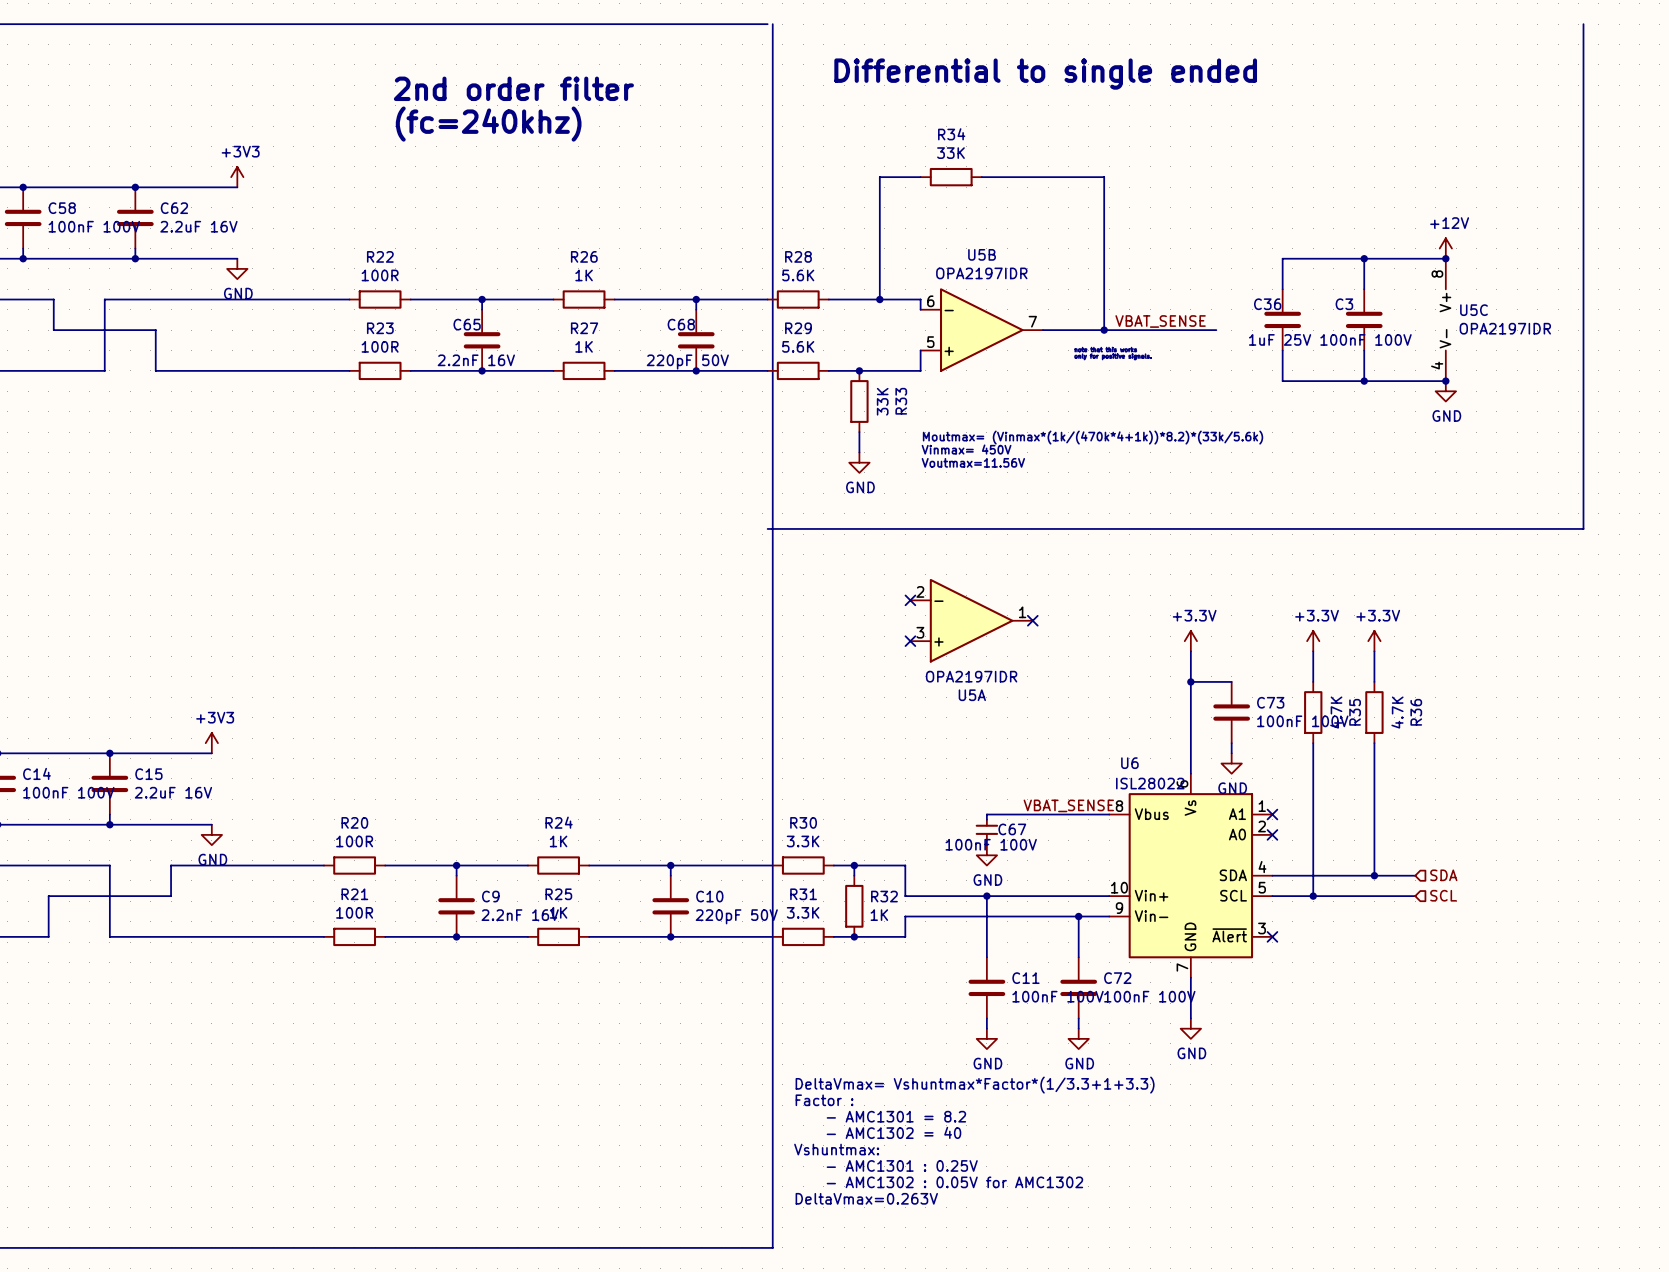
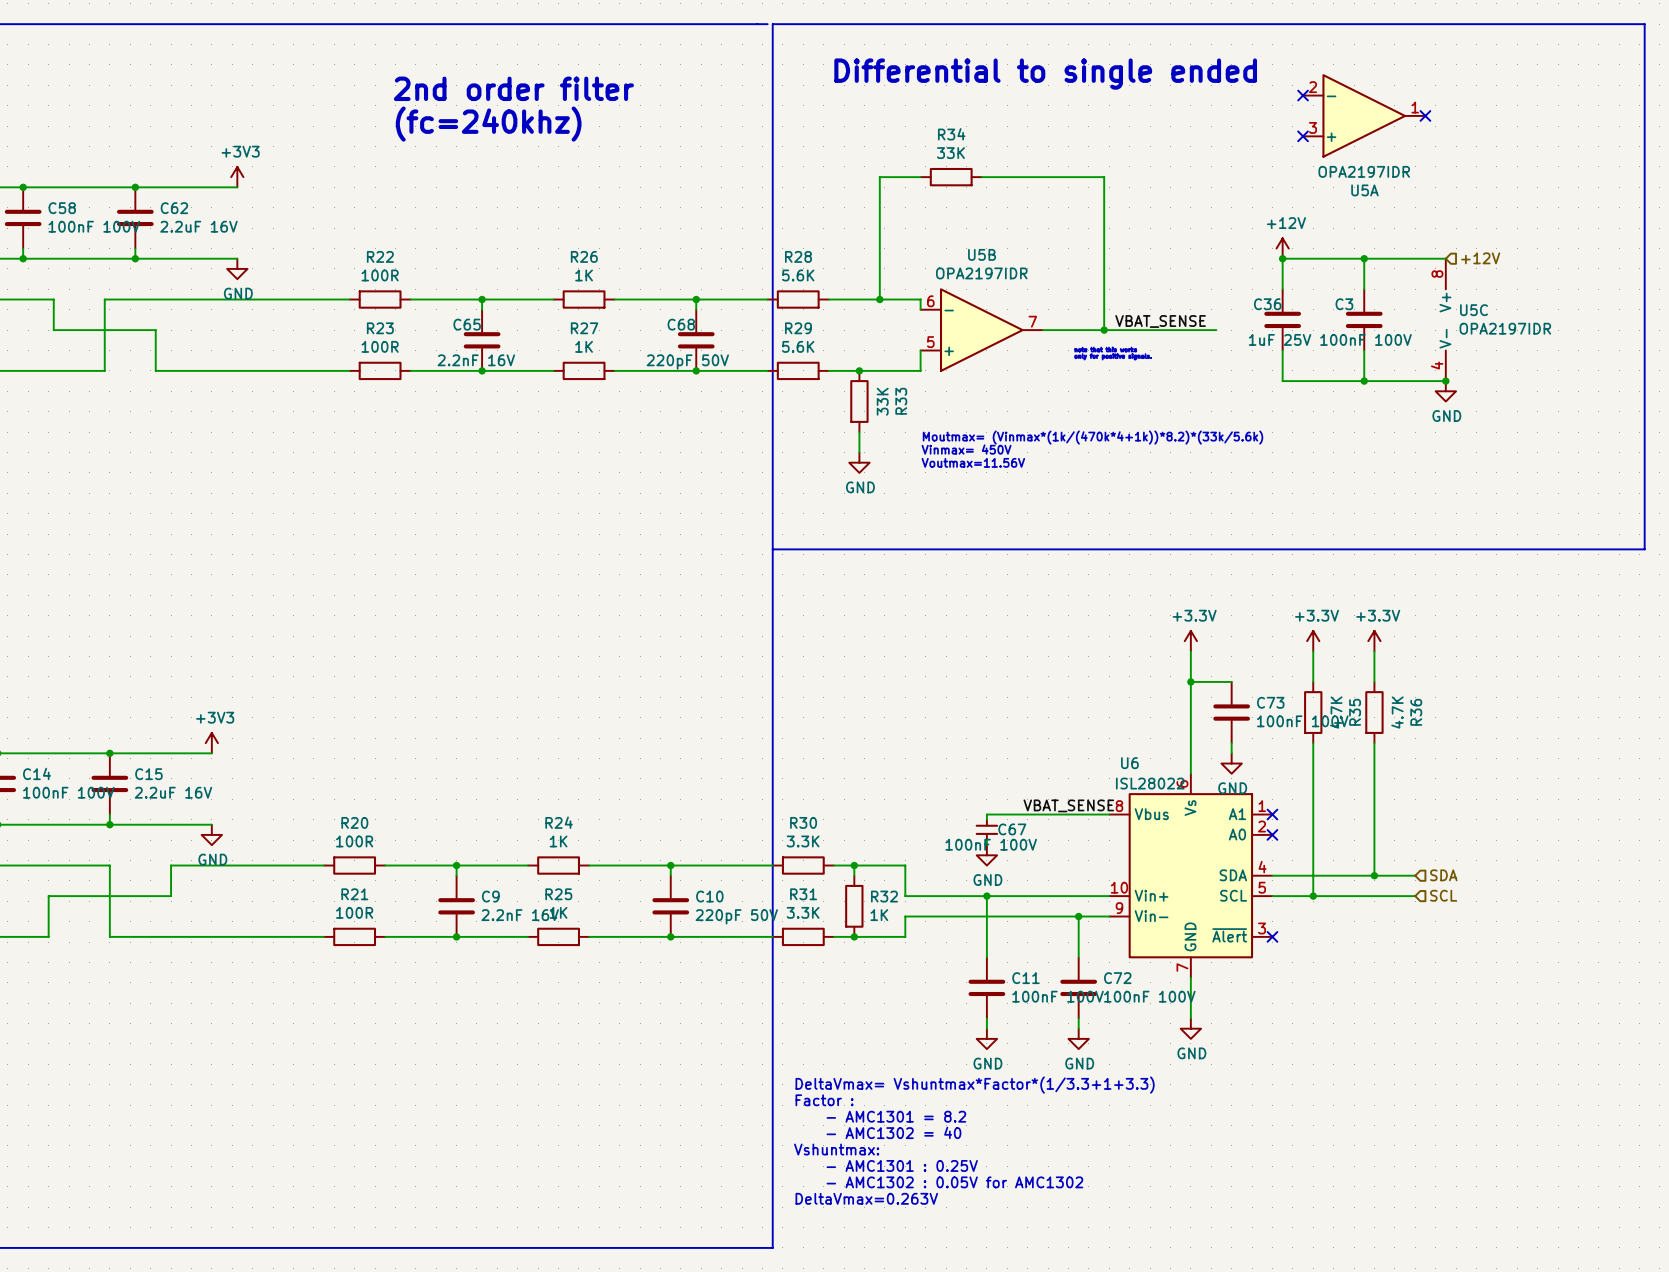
line: none -> (772, 24) (1644, 24) (1644, 549) (772, 549)
line: (1583, 24) (1583, 528) (767, 528) -> none
no-connect mark: none -> (1303, 95)
no-connect mark: none -> (1425, 115)
no-connect mark: none -> (1303, 136)
power symbol position: +12V (1445, 248) -> +12V (1282, 248)
junction: none -> (1282, 258)
junction: (1445, 258) -> none
hierarchical label: none -> +12V (1480, 258)
no-connect mark: (910, 600) -> none
U5A position: (971, 620) -> (1364, 115)
no-connect mark: (1032, 620) -> none
no-connect mark: (910, 641) -> none

